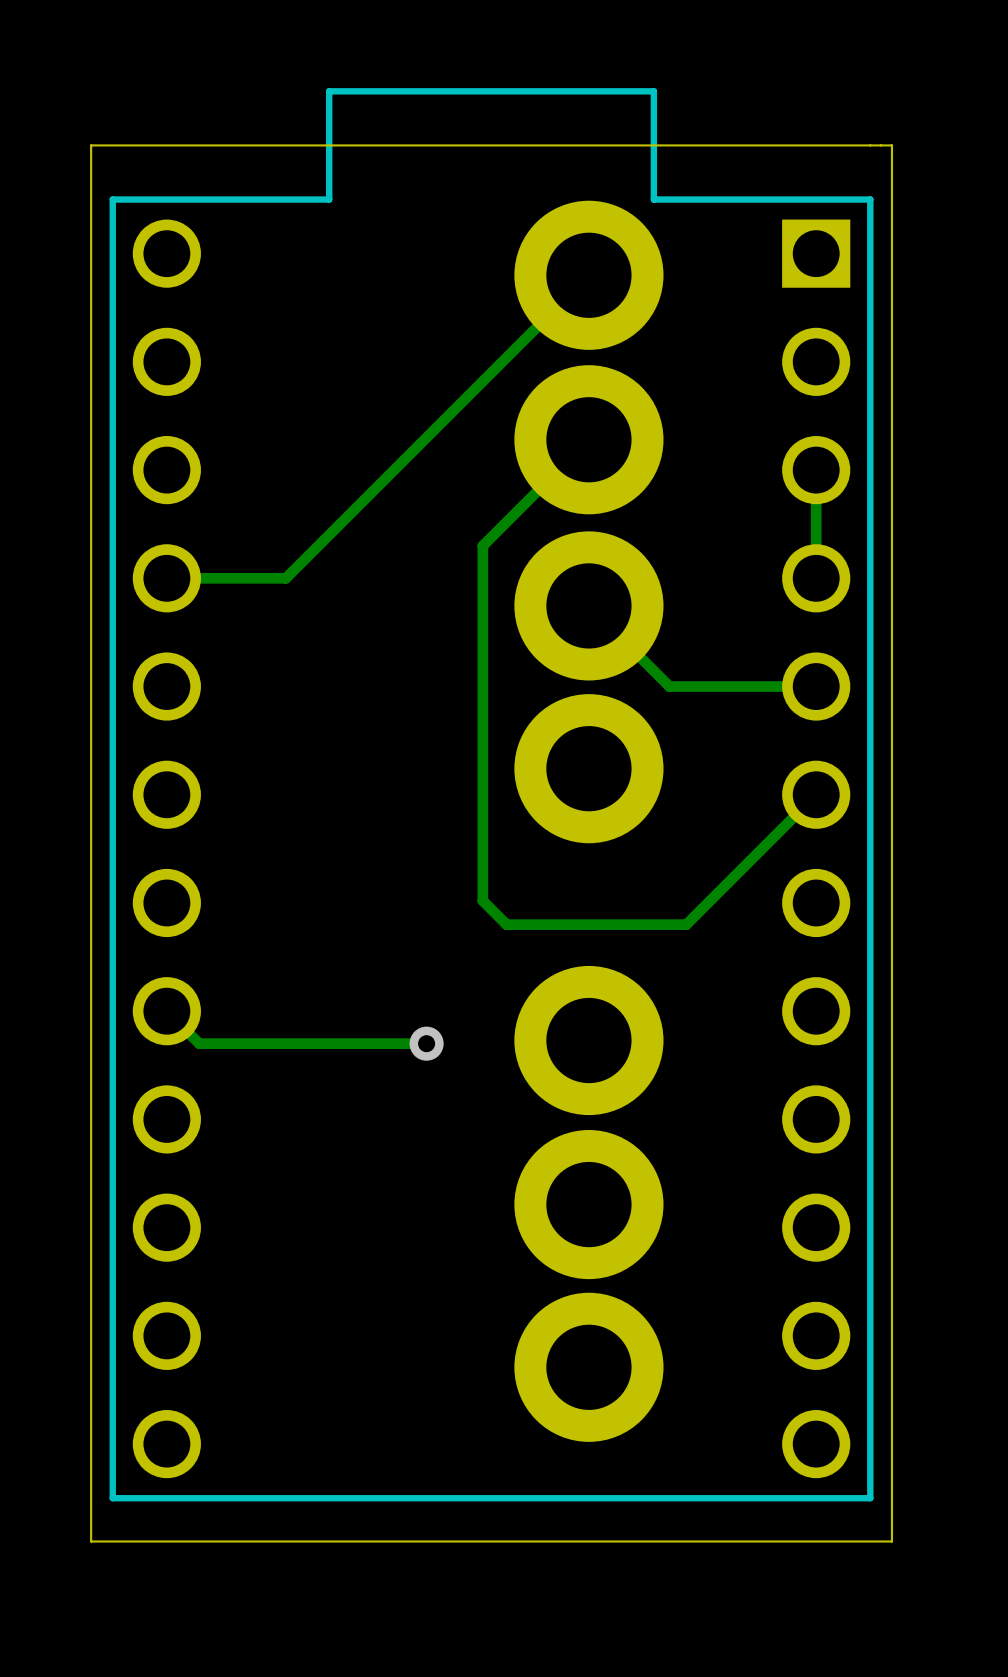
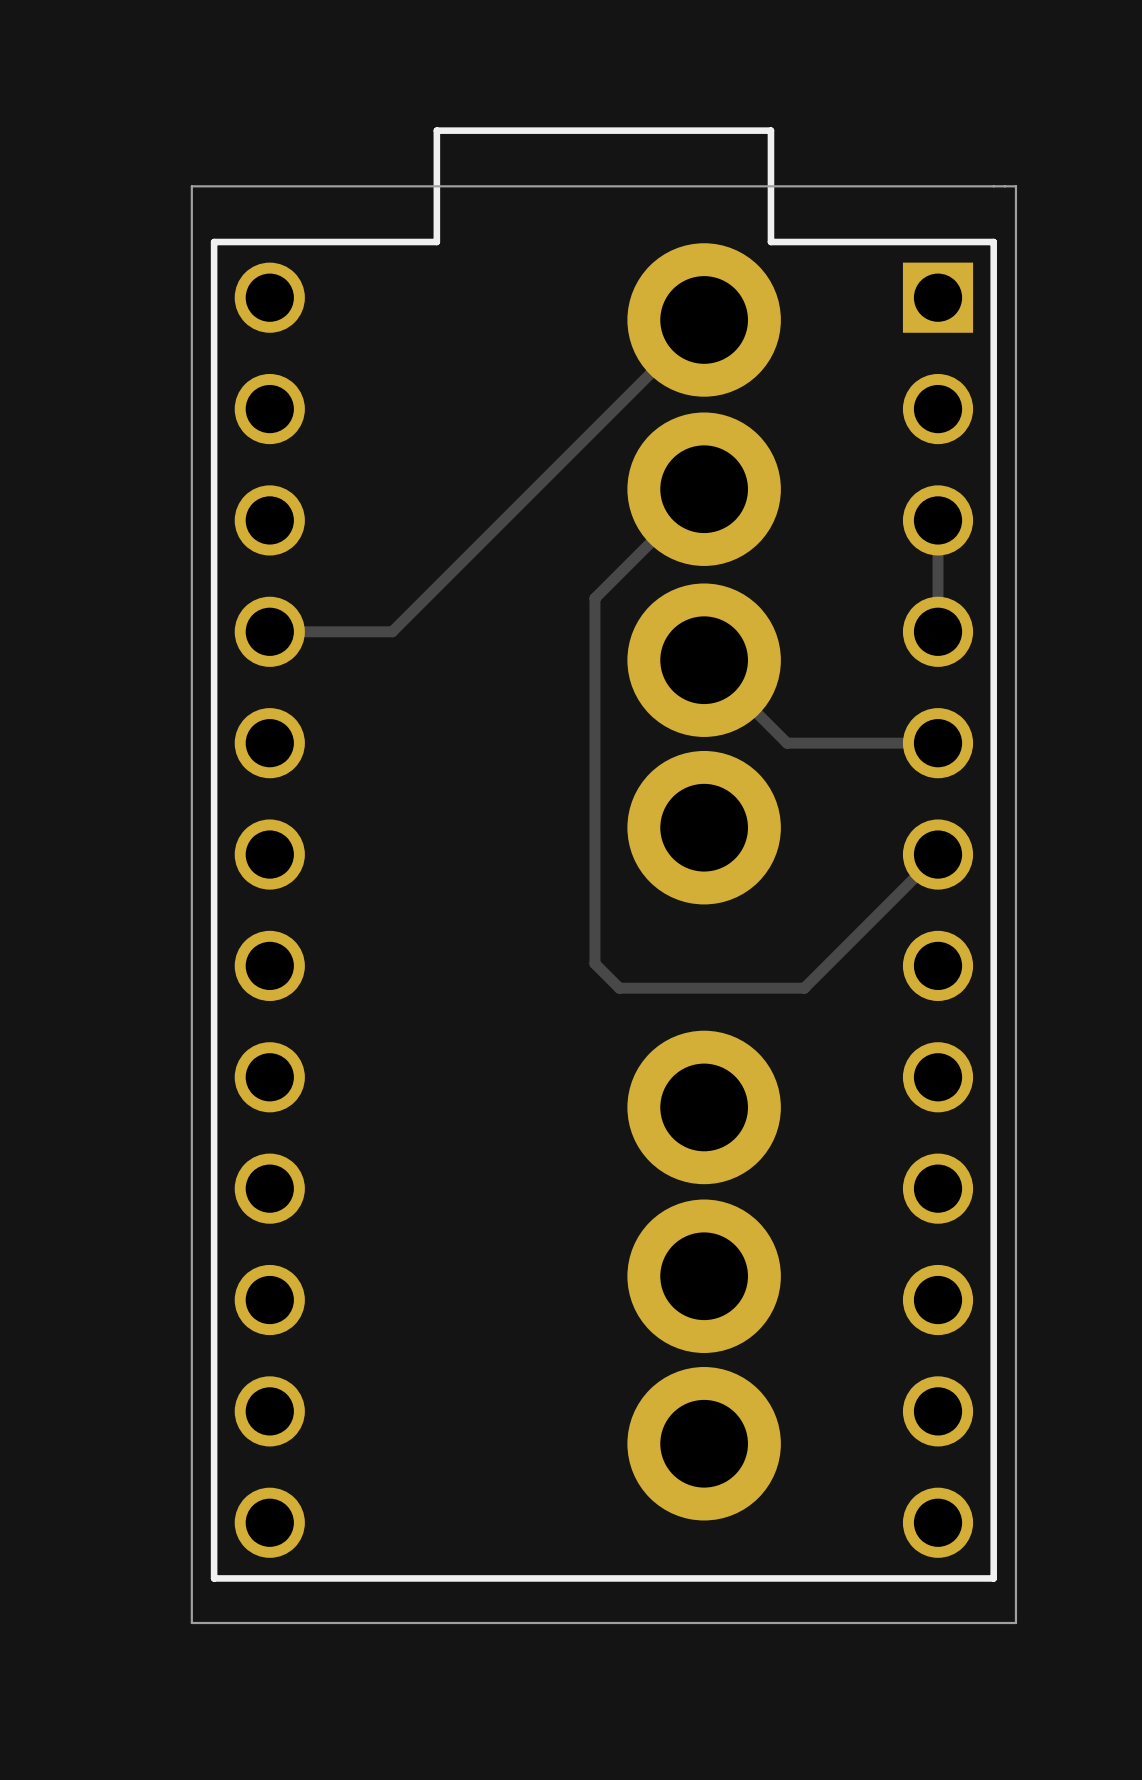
track: (166, 1011) (199, 1043) (426, 1043) -> none
via: (426, 1043) -> none

